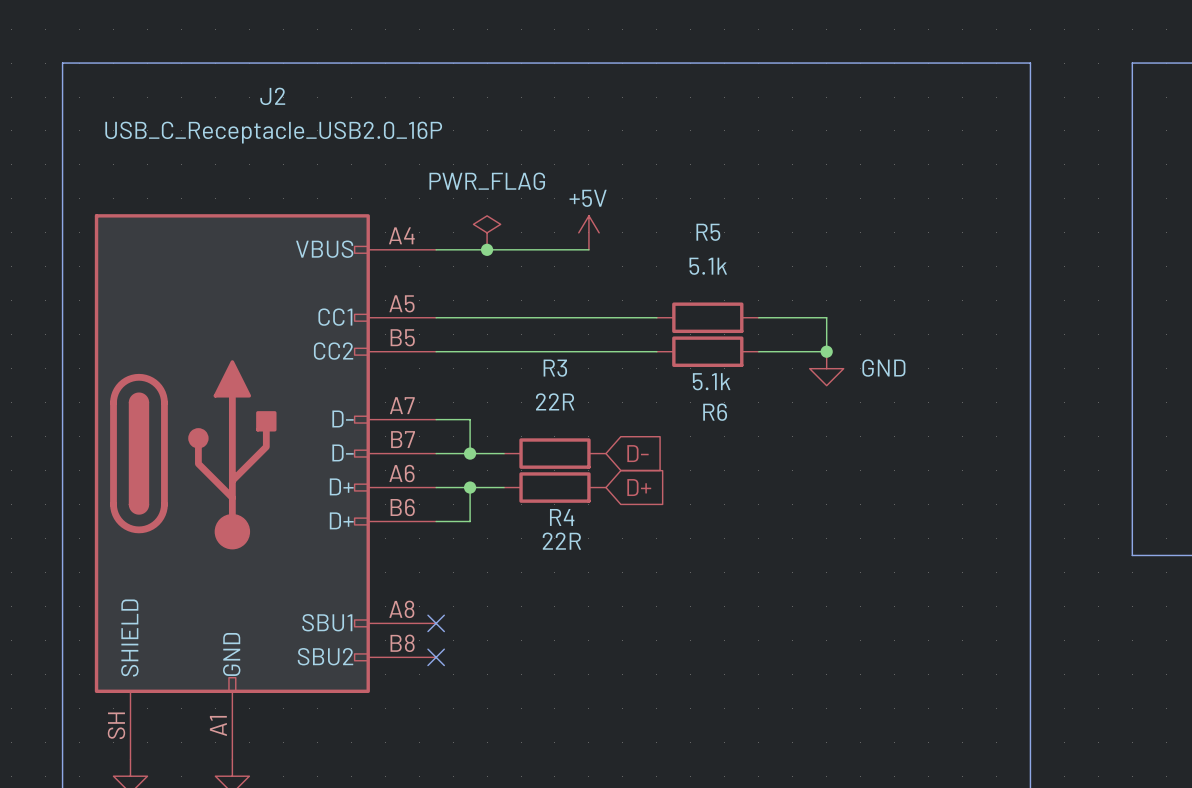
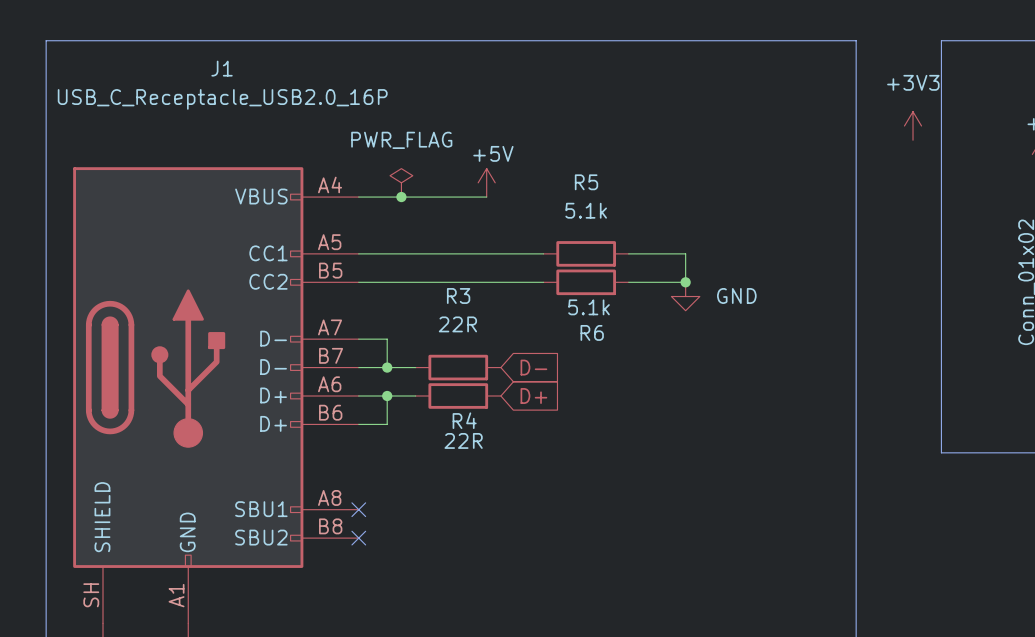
J2 name: J2 (272, 96) -> J1 (222, 68)
power symbol: none -> +3V3 (913, 125)

